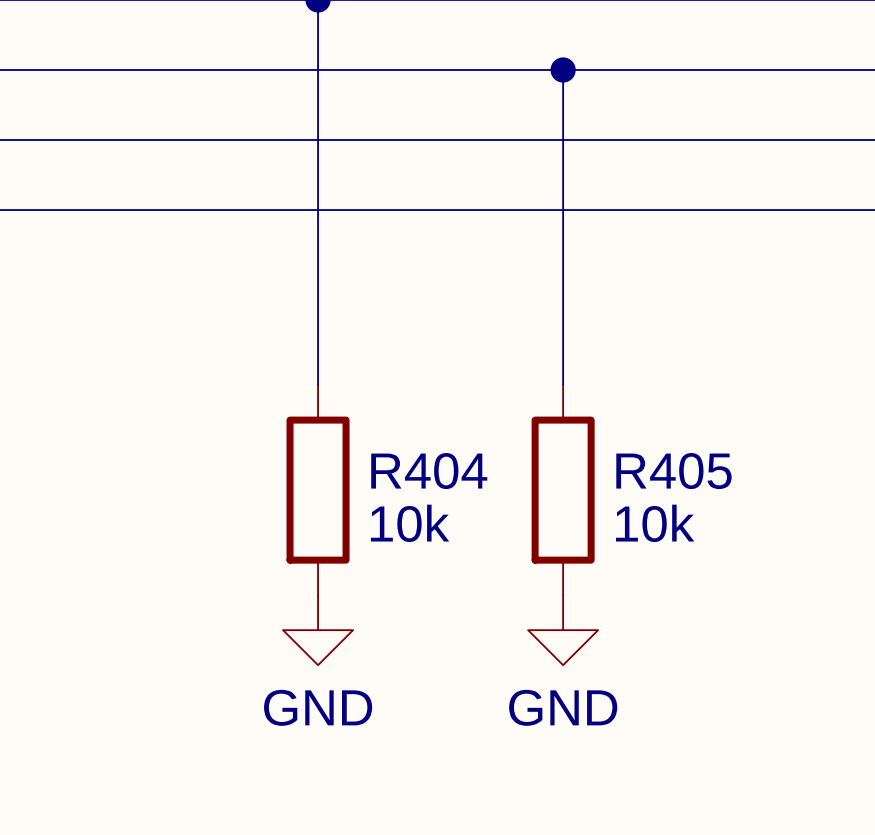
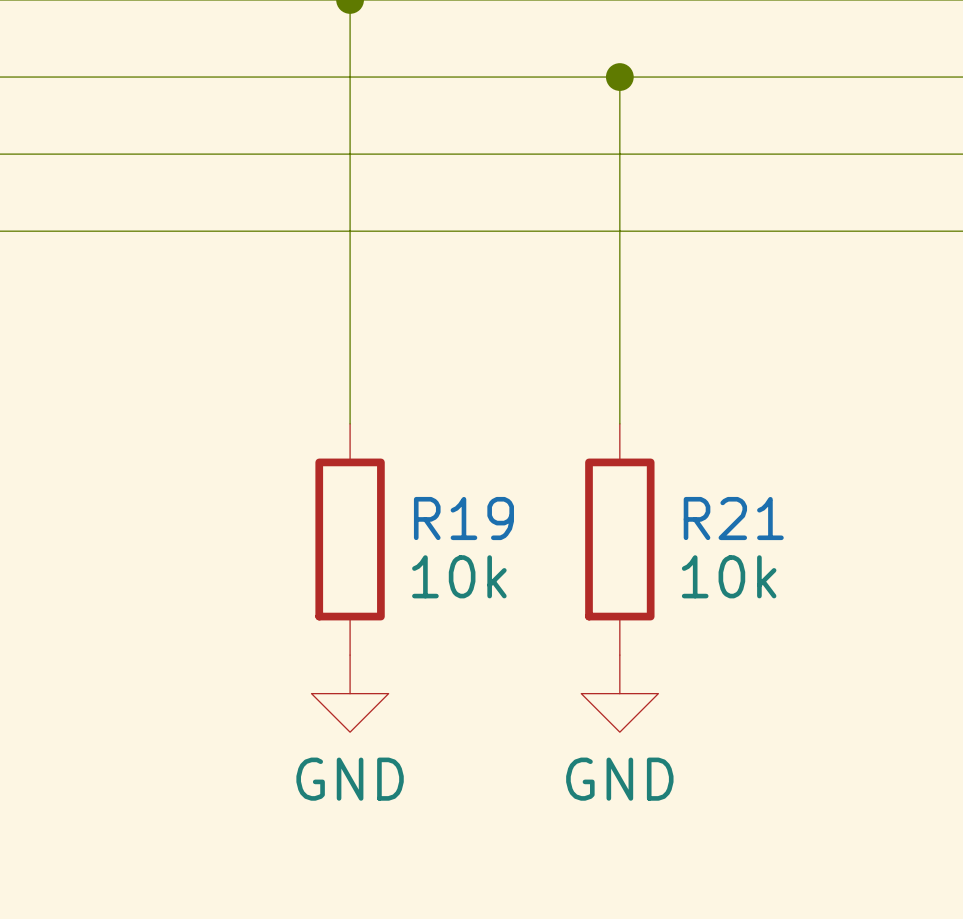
R404 name: R404 (429, 471) -> R19 (463, 518)
R405 name: R405 (673, 471) -> R21 (733, 518)

